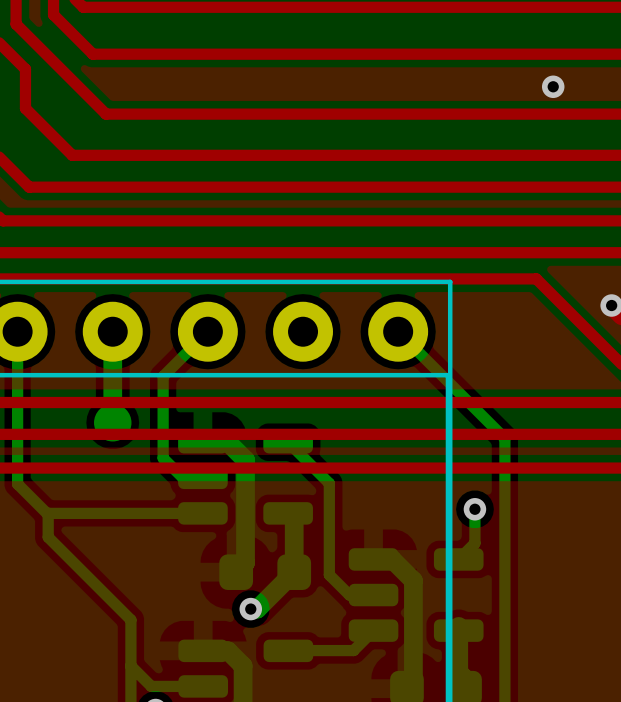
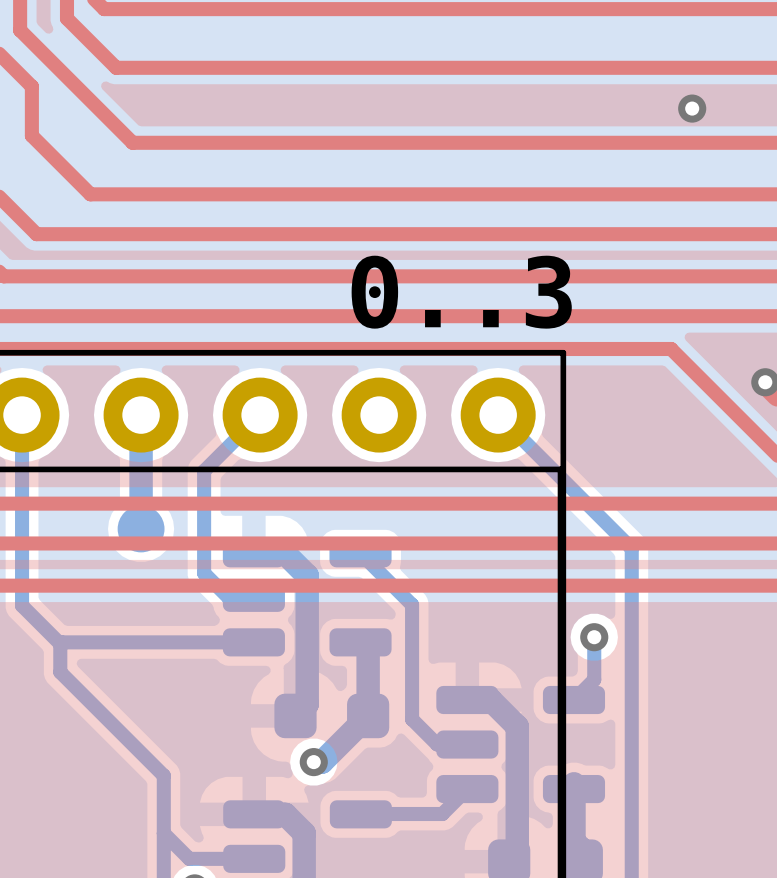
text: none -> 0..3 (461, 292)

